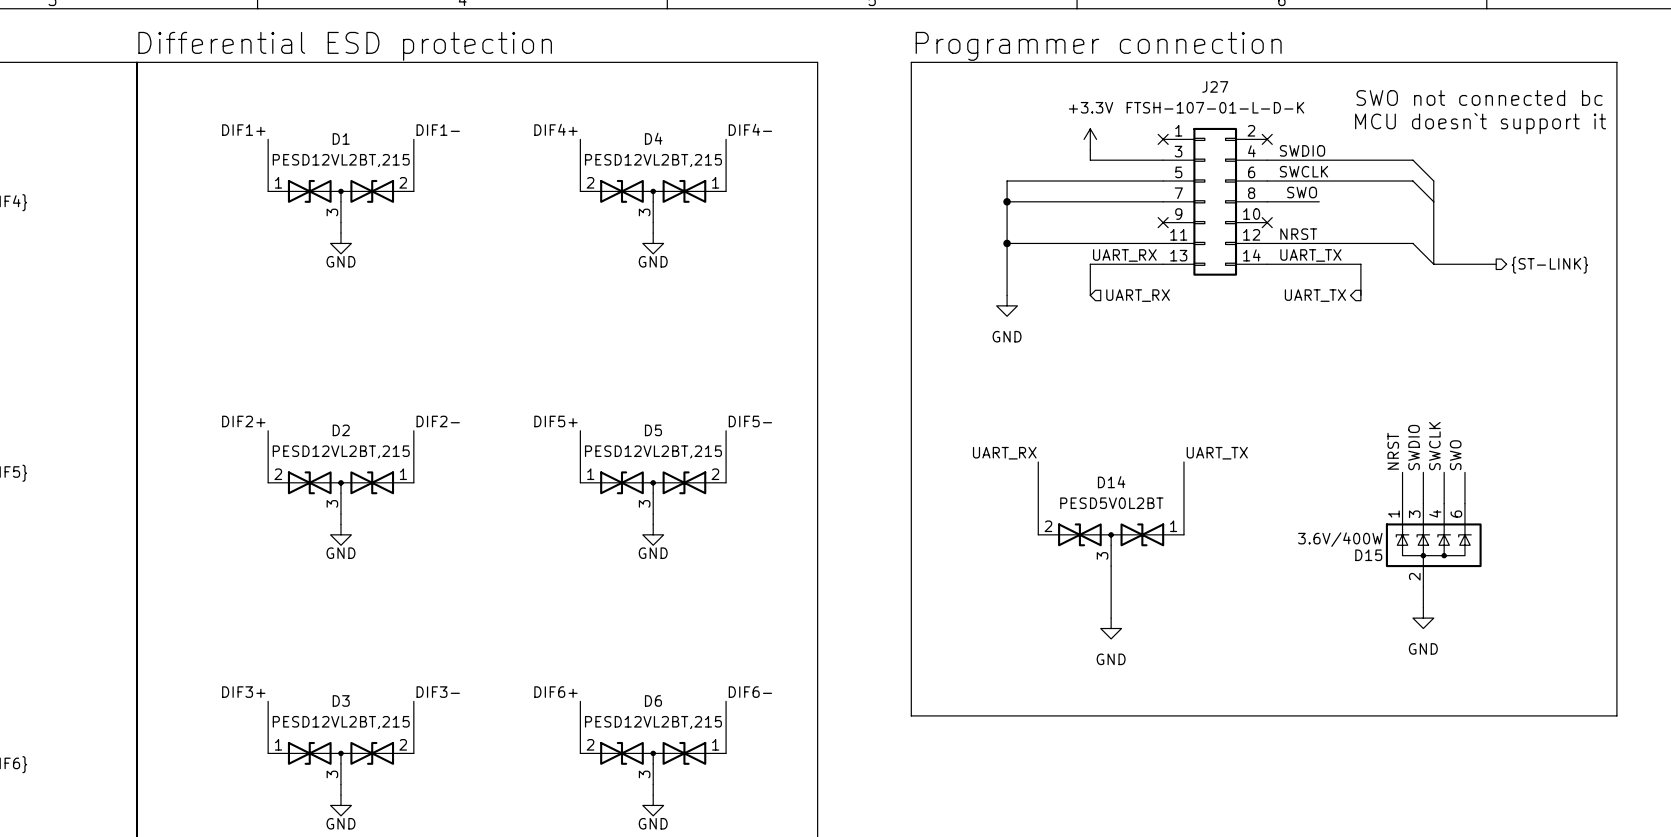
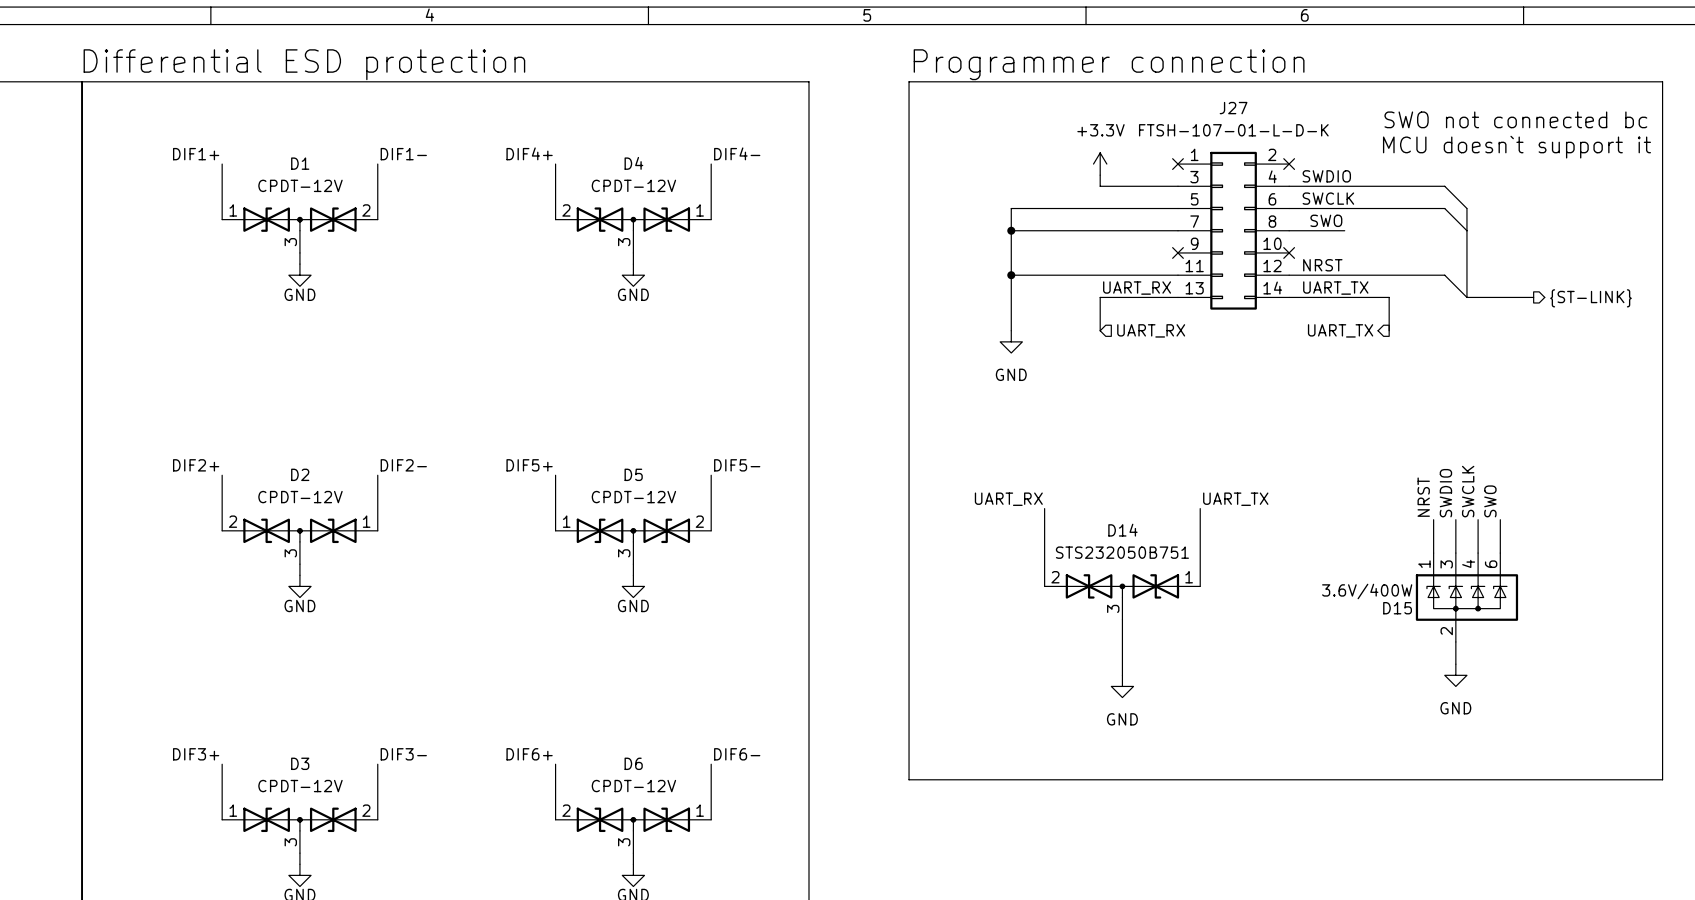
D1 value: PESD12VL2BT,215 (341, 160) -> CPDT-12V (300, 185)
D4 value: PESD12VL2BT,215 (653, 160) -> CPDT-12V (633, 185)
D2 value: PESD12VL2BT,215 (341, 451) -> CPDT-12V (300, 497)
D5 value: PESD12VL2BT,215 (653, 451) -> CPDT-12V (633, 497)
D14 value: PESD5V0L2BT (1111, 503) -> STS232050B751 (1122, 552)
D3 value: PESD12VL2BT,215 (341, 722) -> CPDT-12V (300, 786)
D6 value: PESD12VL2BT,215 (653, 722) -> CPDT-12V (633, 786)

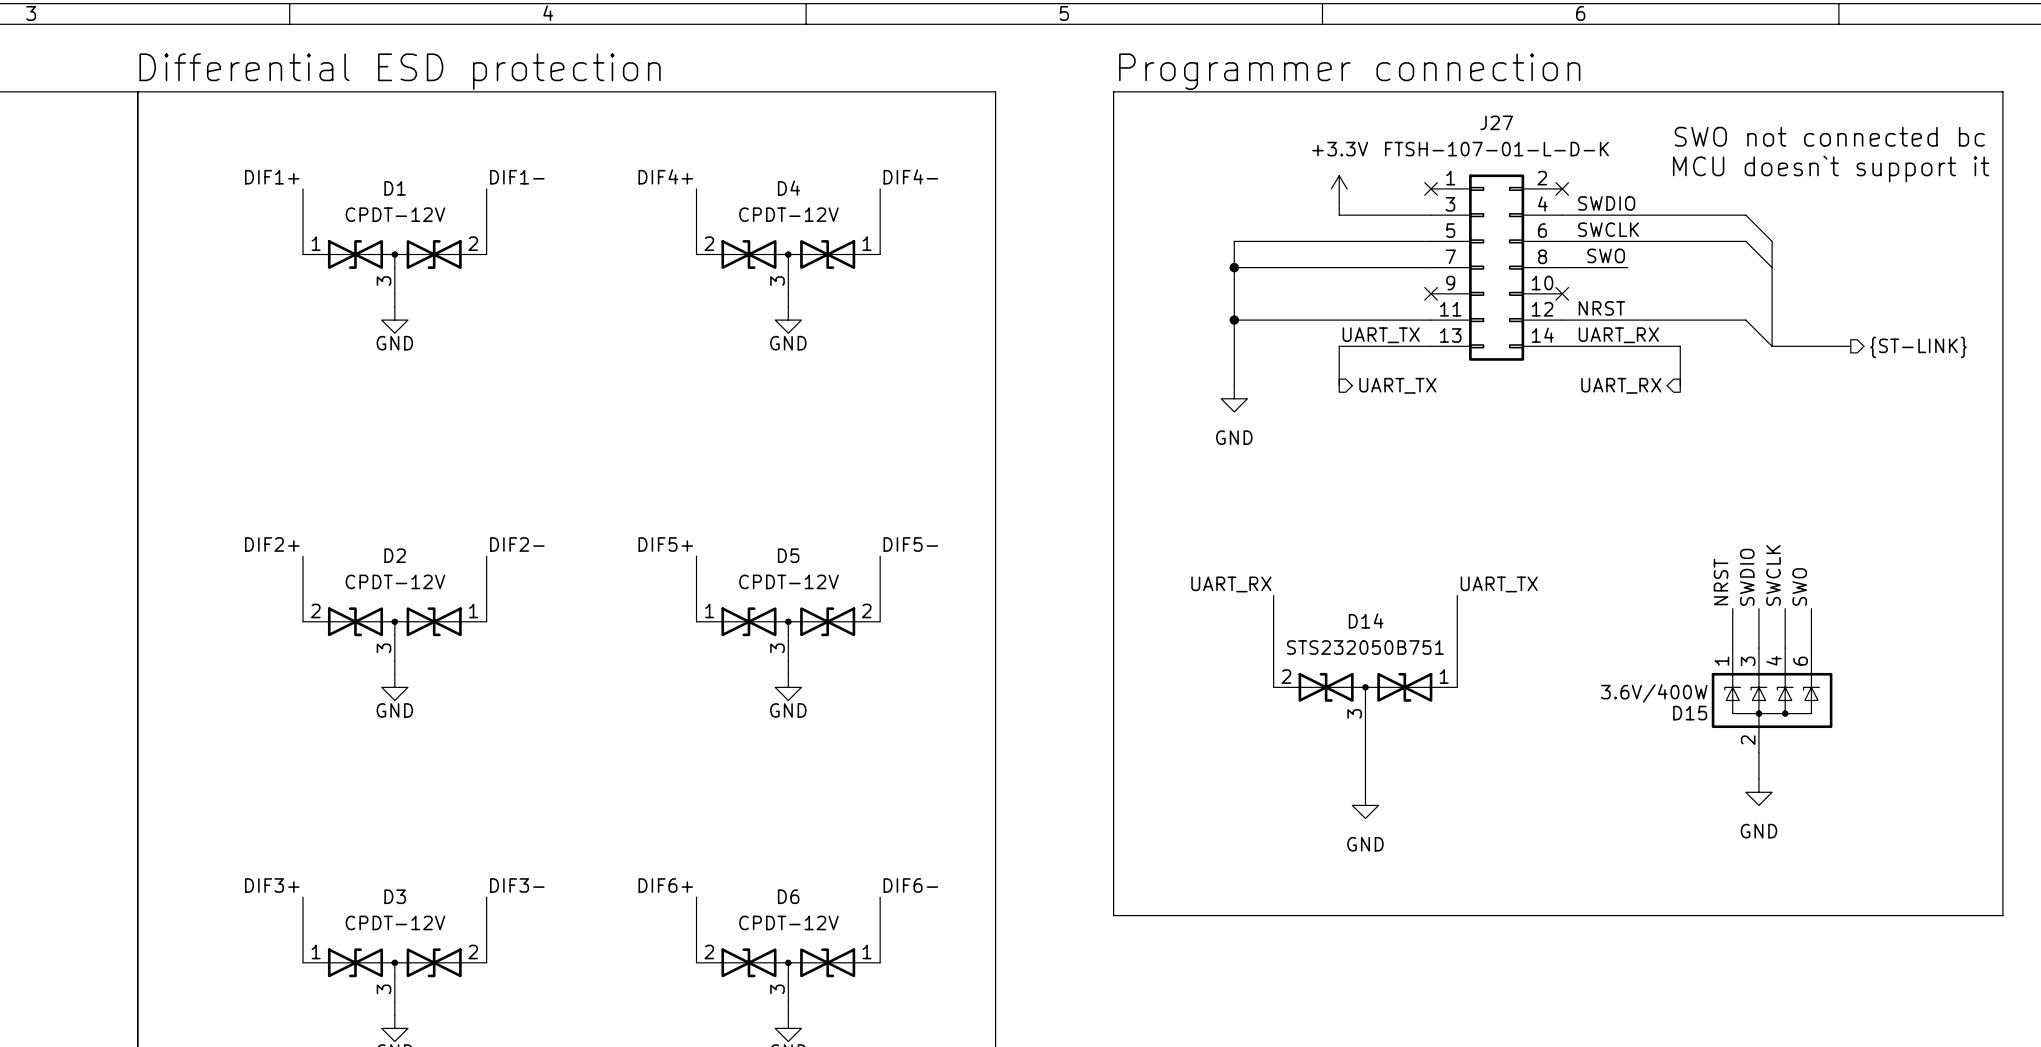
label: UART_RX (1137, 288) -> UART_TX (1381, 335)
label: UART_TX (1335, 288) -> UART_RX (1618, 335)
hierarchical label shape: input (1151, 330) -> output (1397, 385)
hierarchical label: UART_RX (1151, 330) -> UART_TX (1397, 385)
hierarchical label: UART_TX (1340, 330) -> UART_RX (1621, 385)

